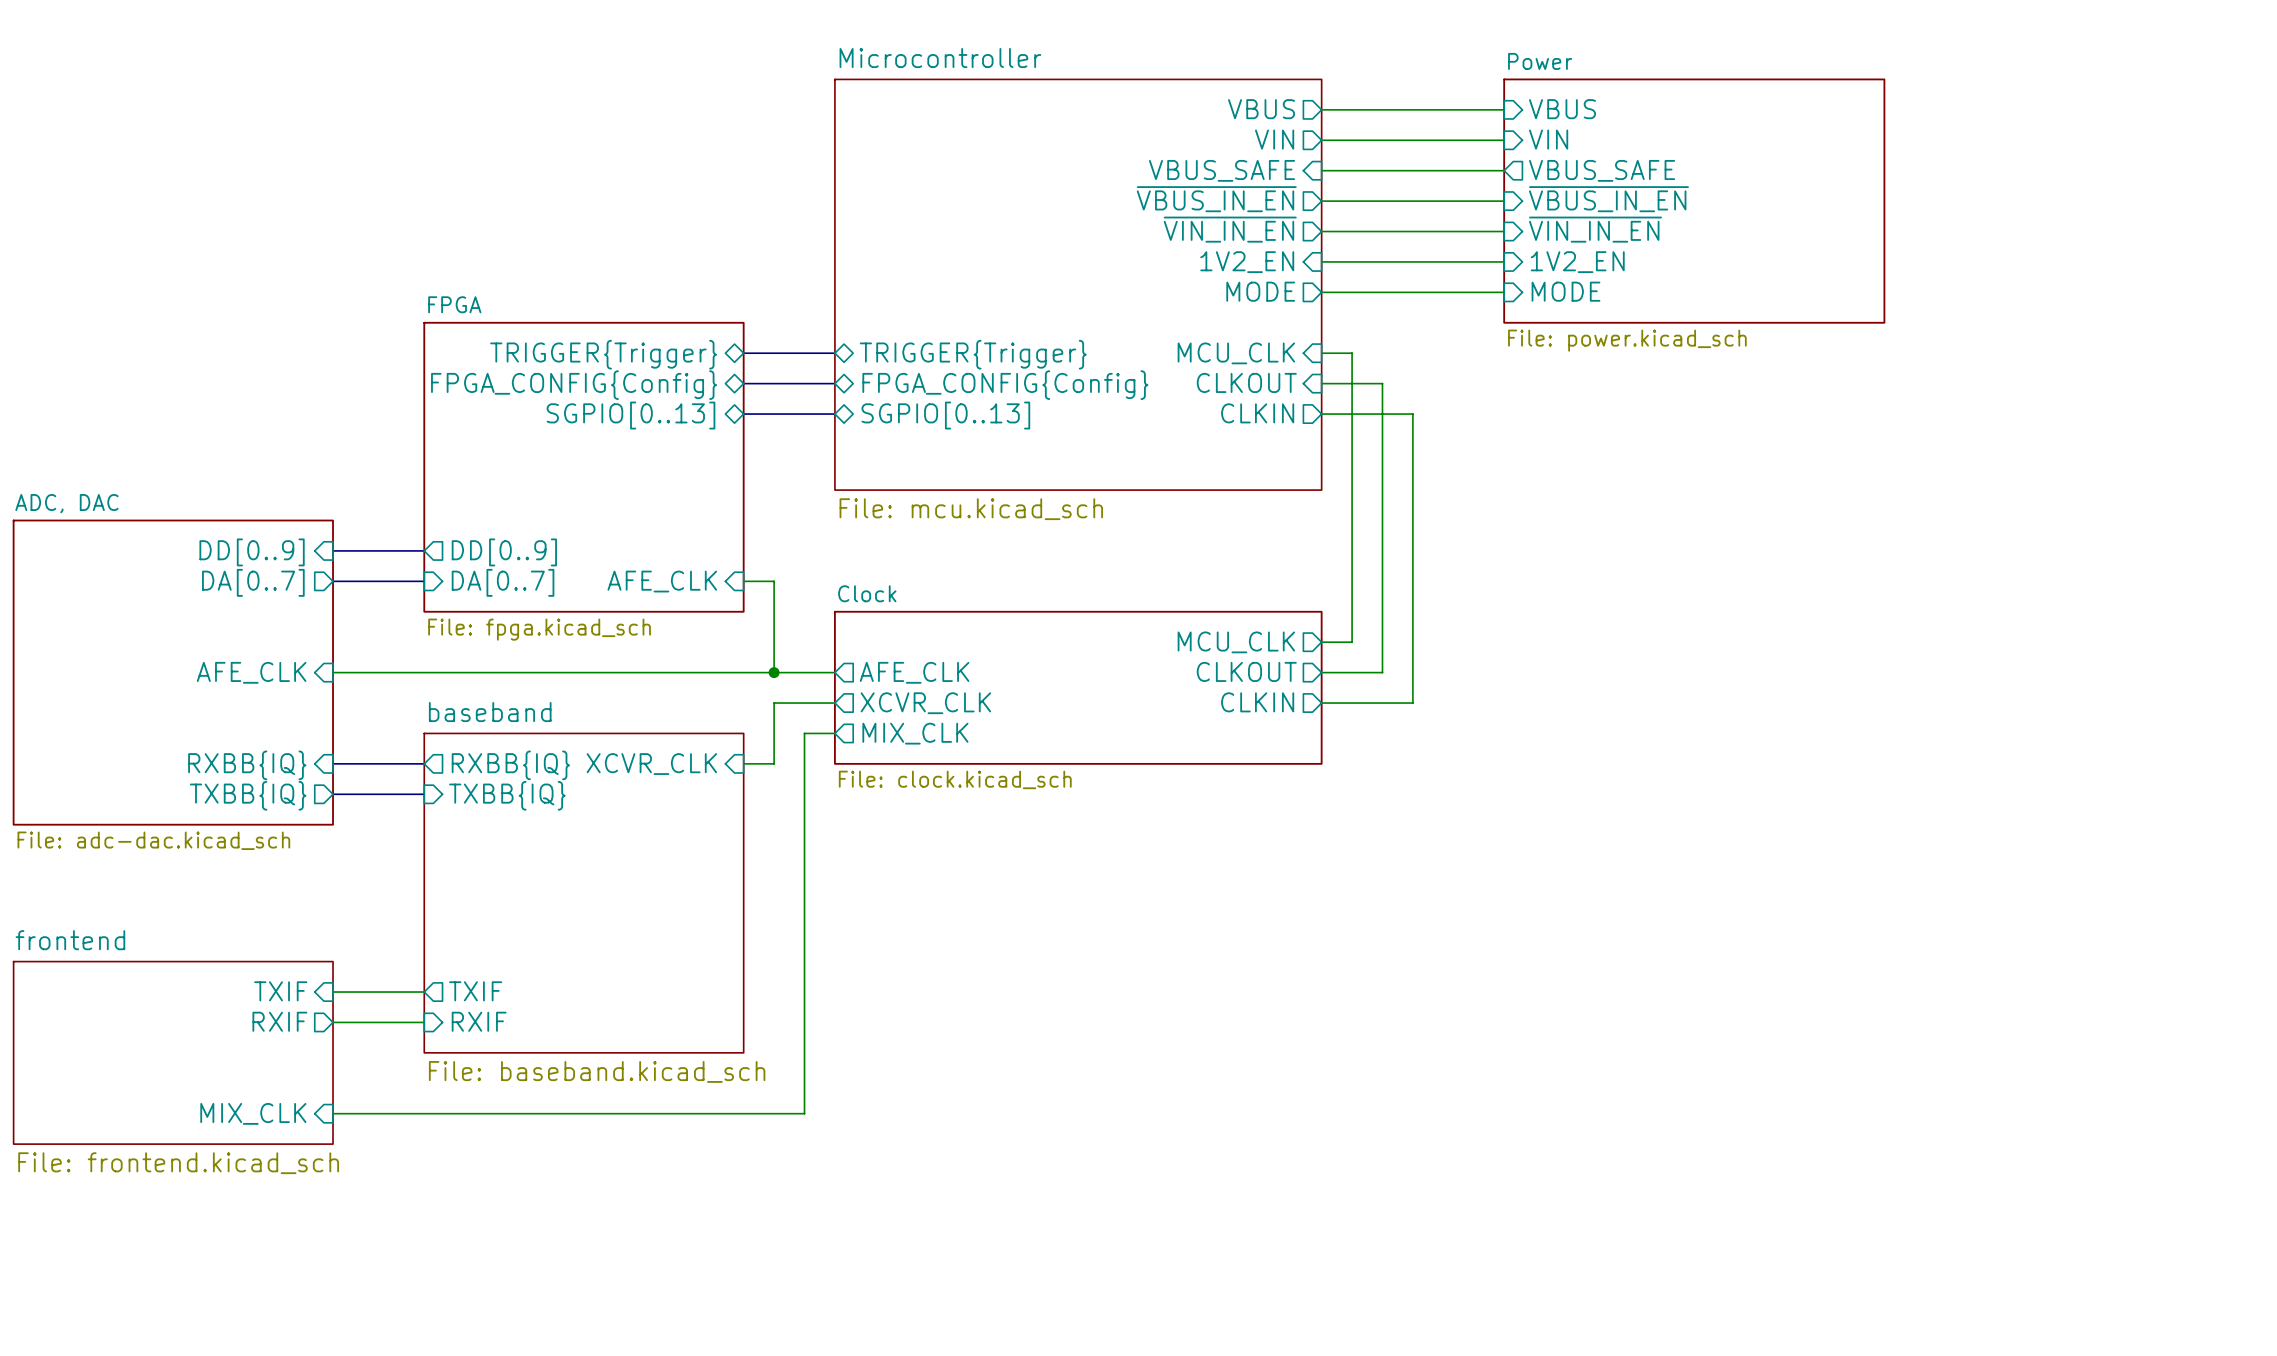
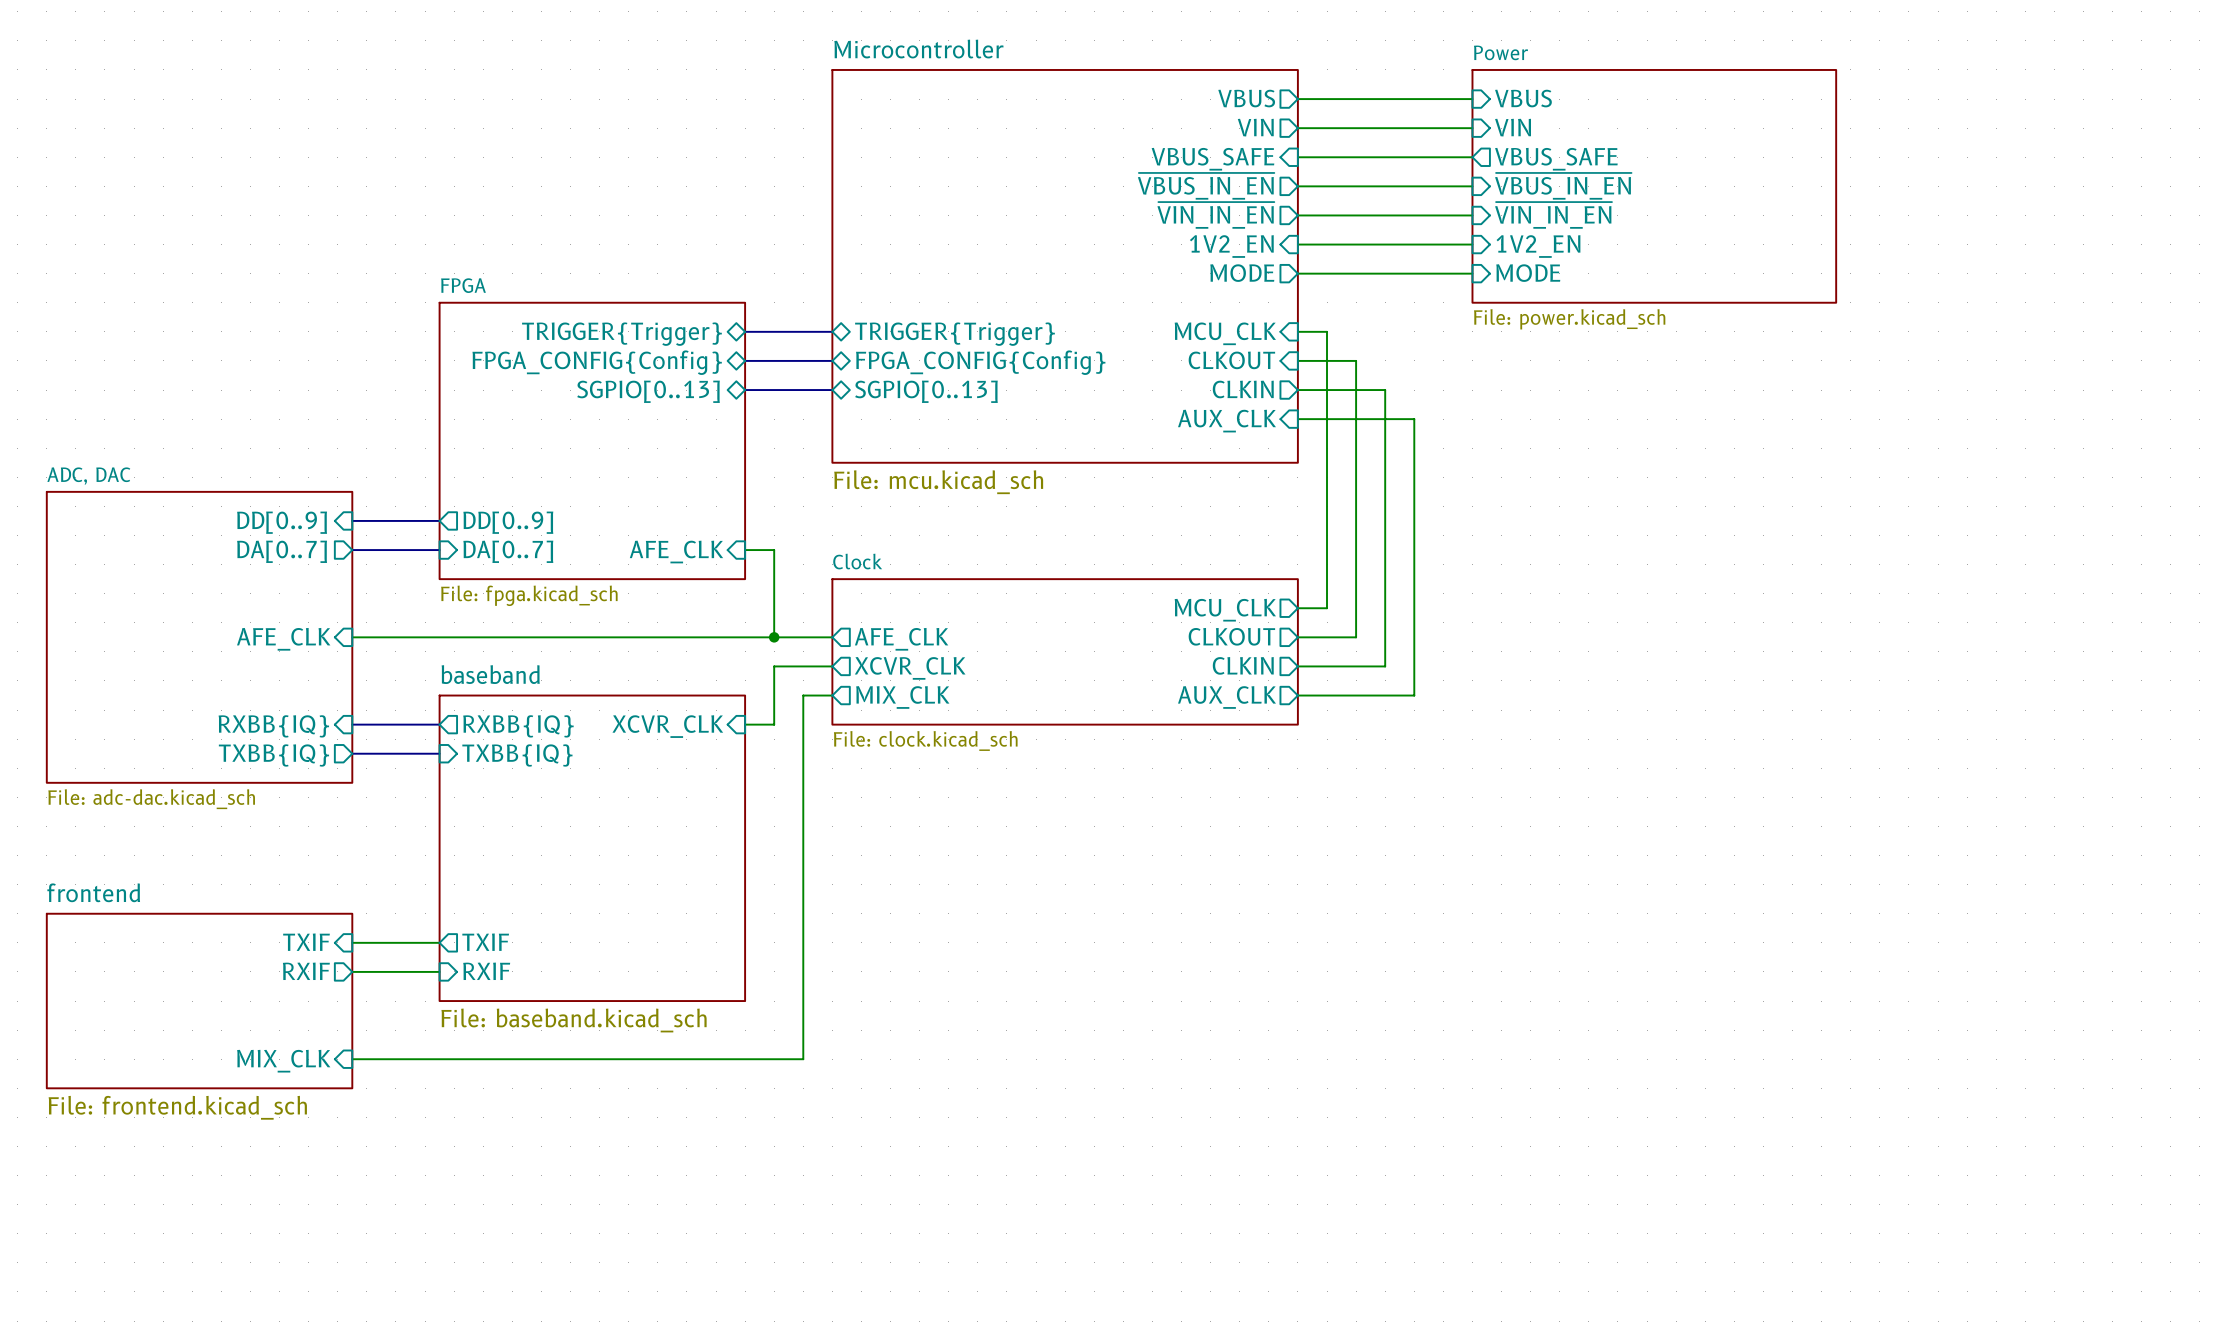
sheet pin: none -> AUX_CLK (1226, 421)
wire: none -> (1297, 419) (1414, 419) (1414, 695) (1297, 695)
sheet pin: none -> AUX_CLK (1226, 697)

